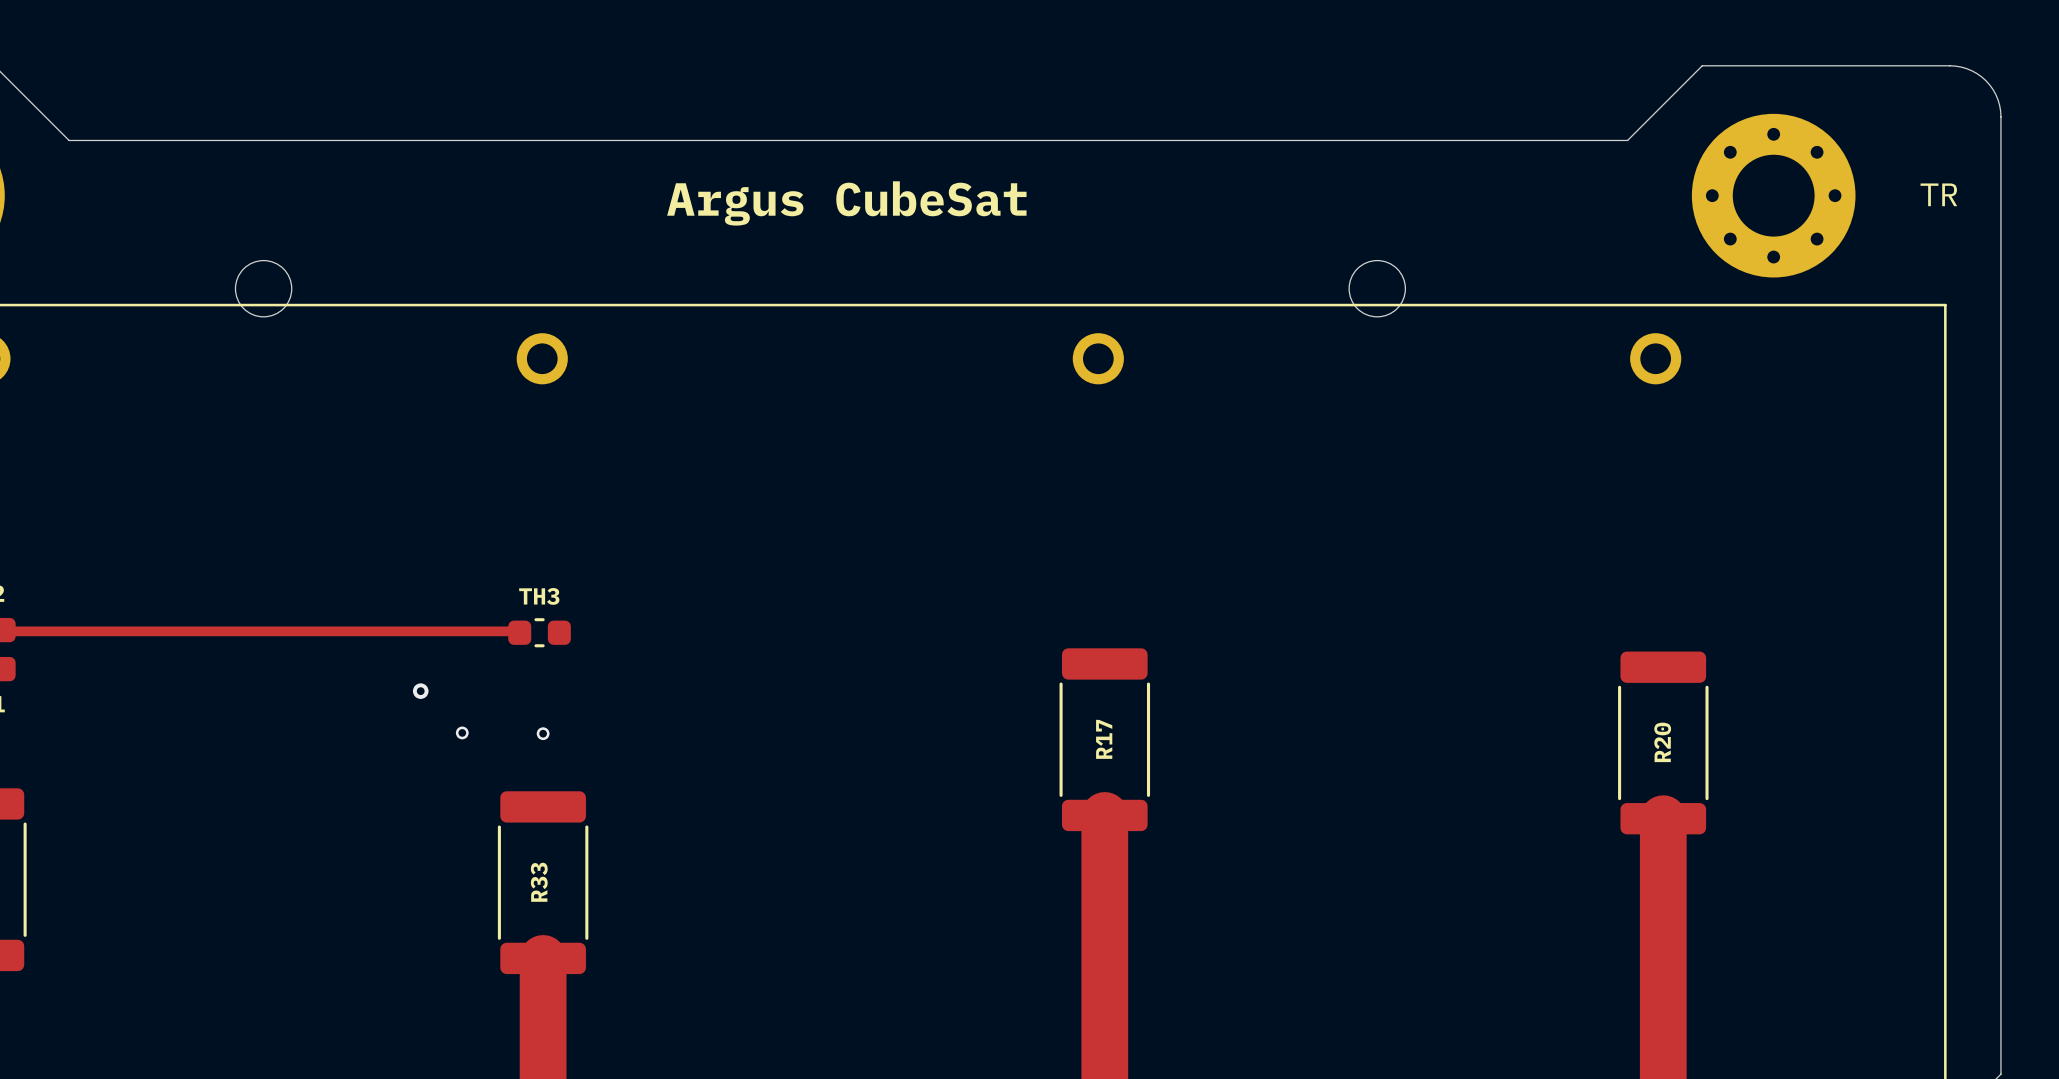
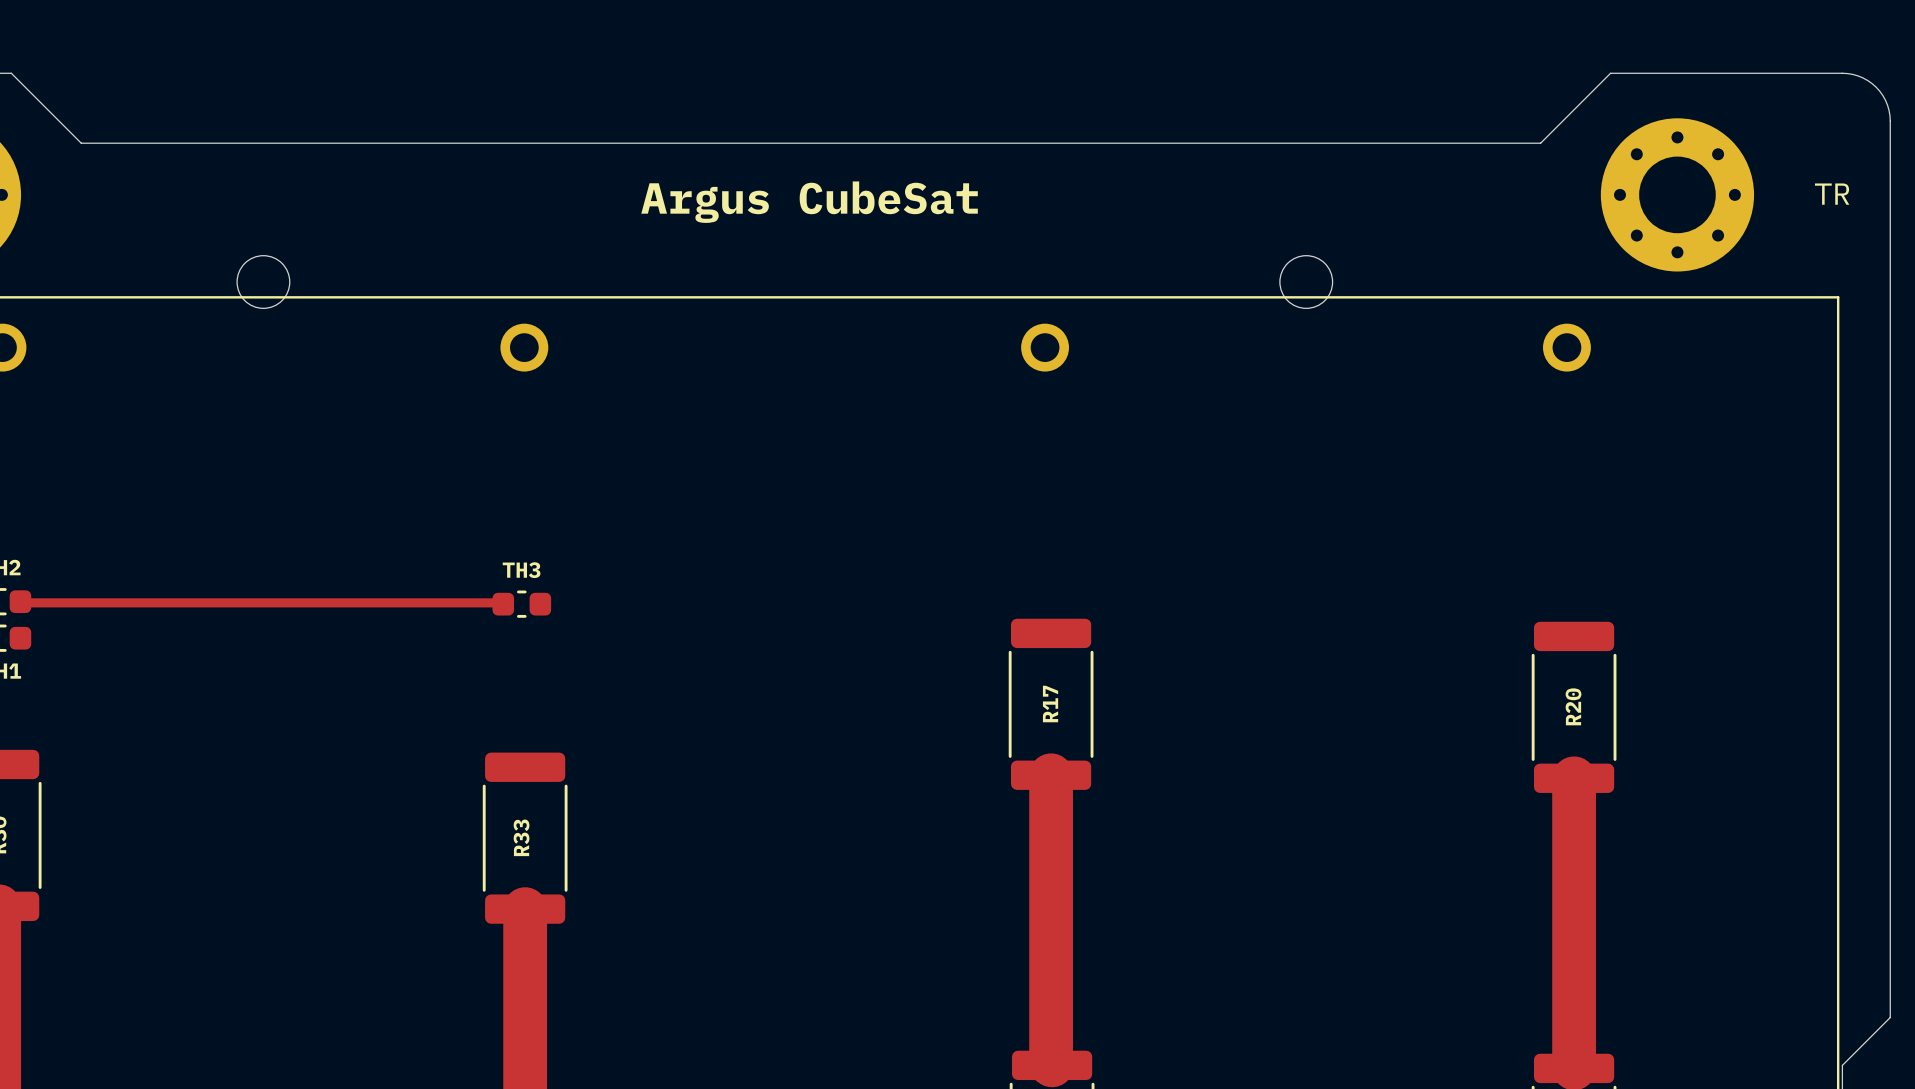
via: (420, 691) -> none
via: (462, 732) -> none
via: (543, 733) -> none

